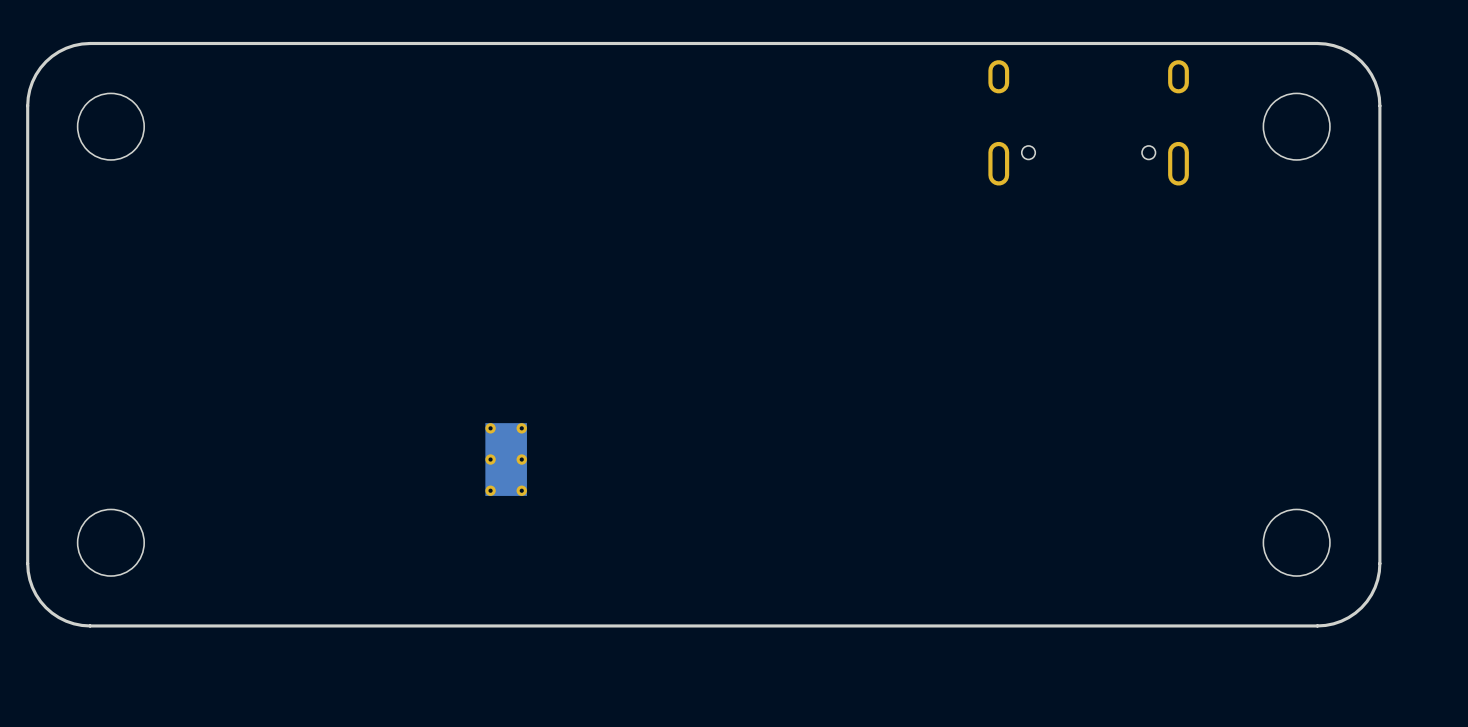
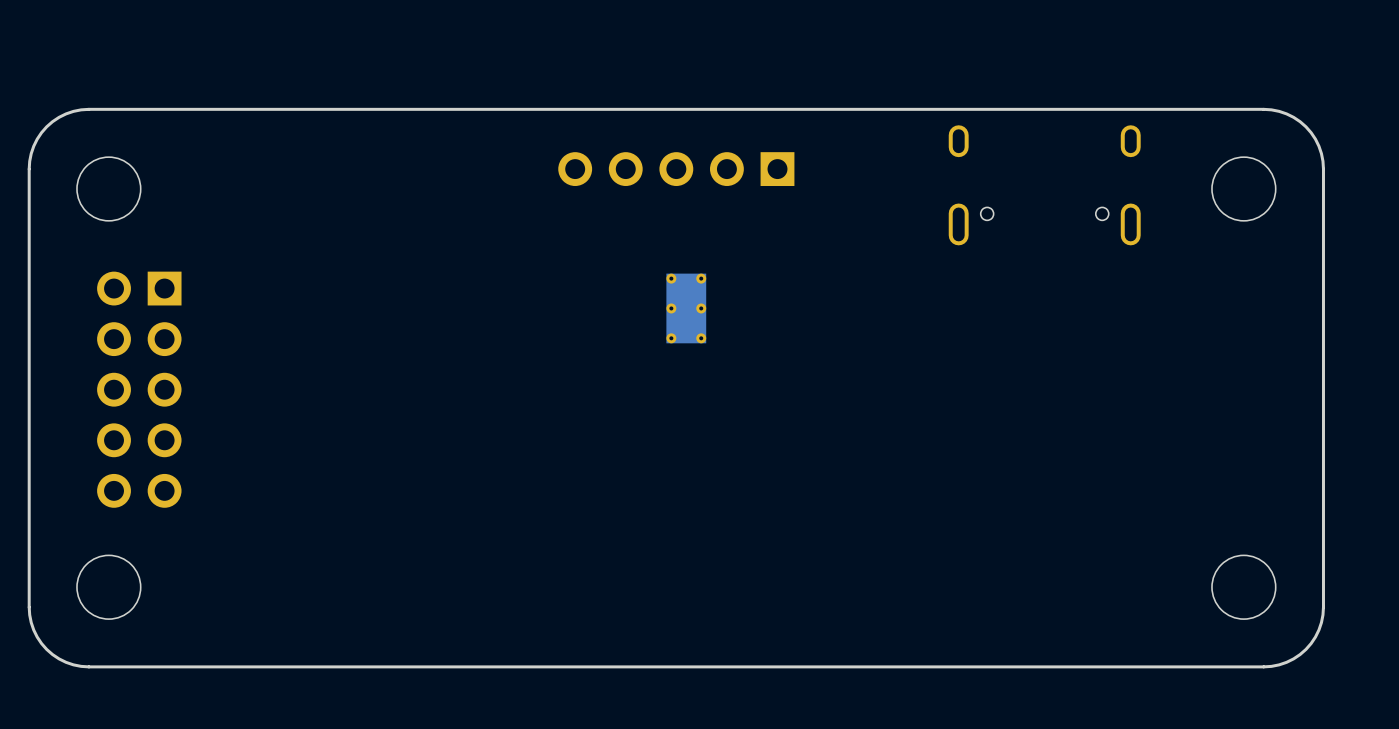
part: none -> (676, 169)
part: none -> (139, 389)
part position: (506, 459) -> (686, 308)

